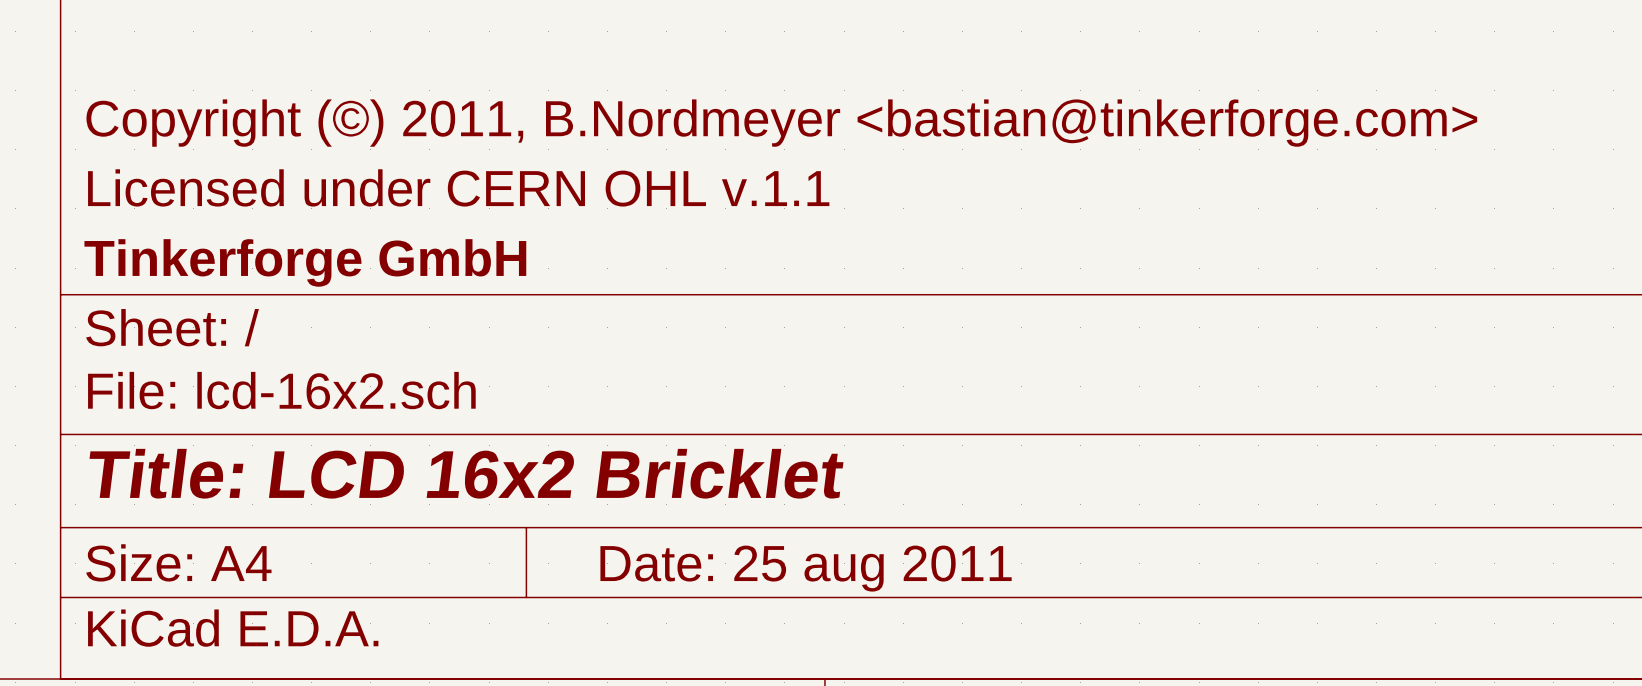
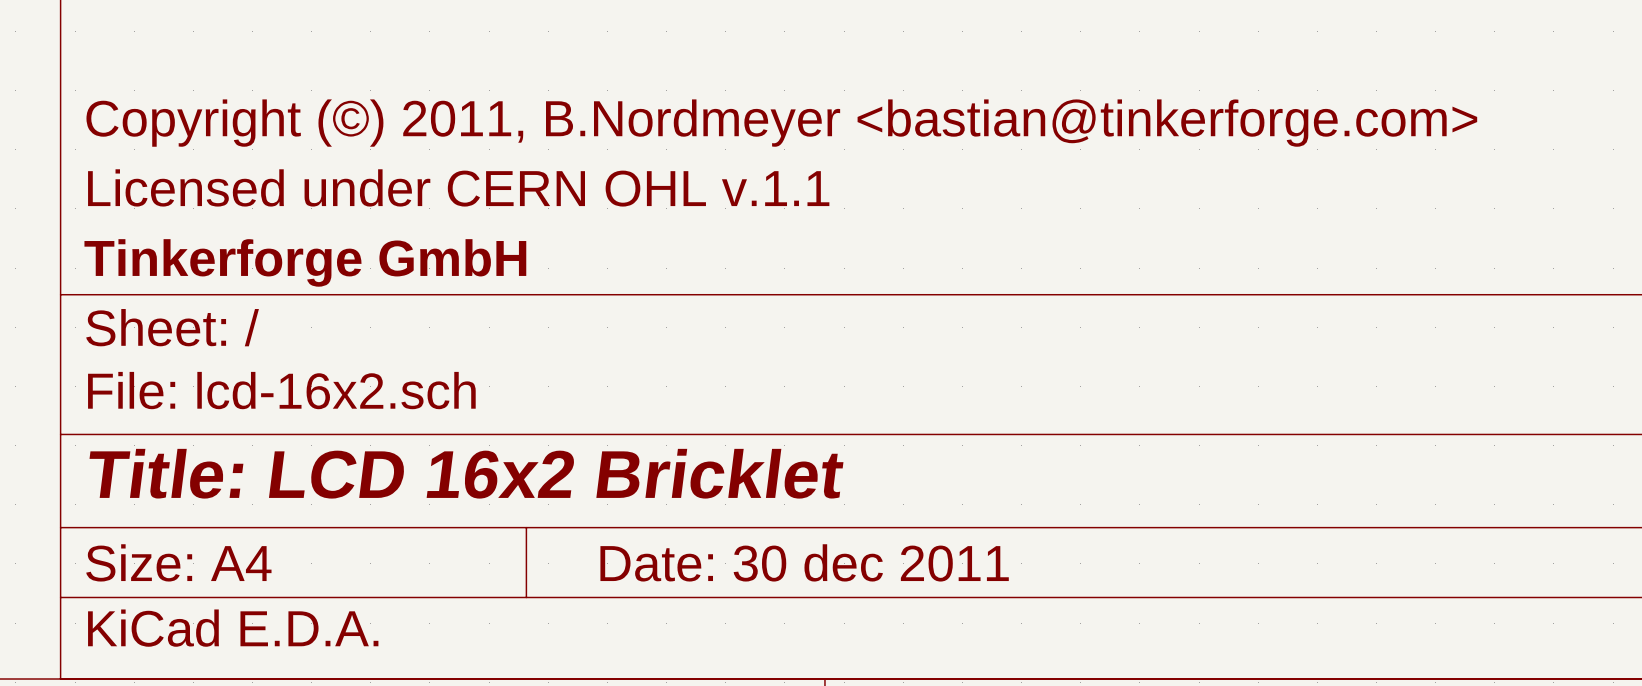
title block: Date: 25 aug 2011 (806, 568) -> Date: 30 dec 2011 (804, 562)

